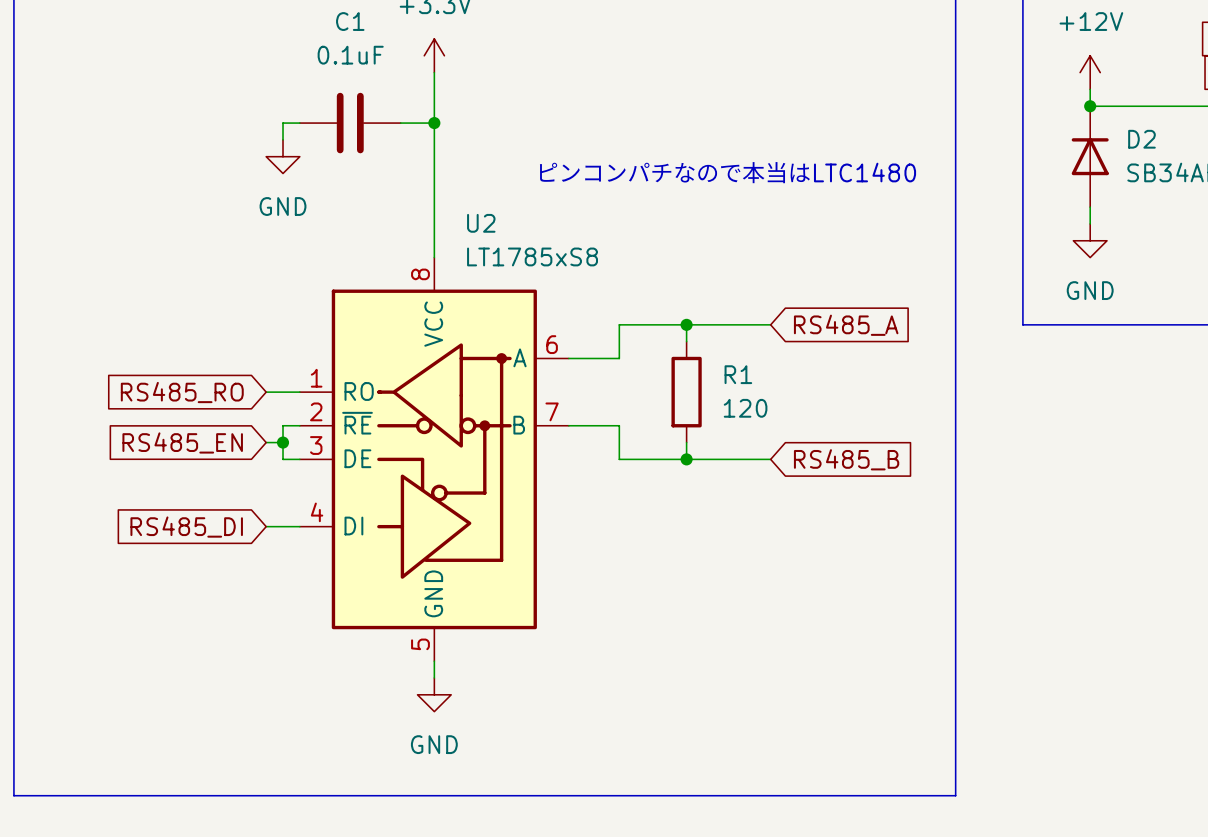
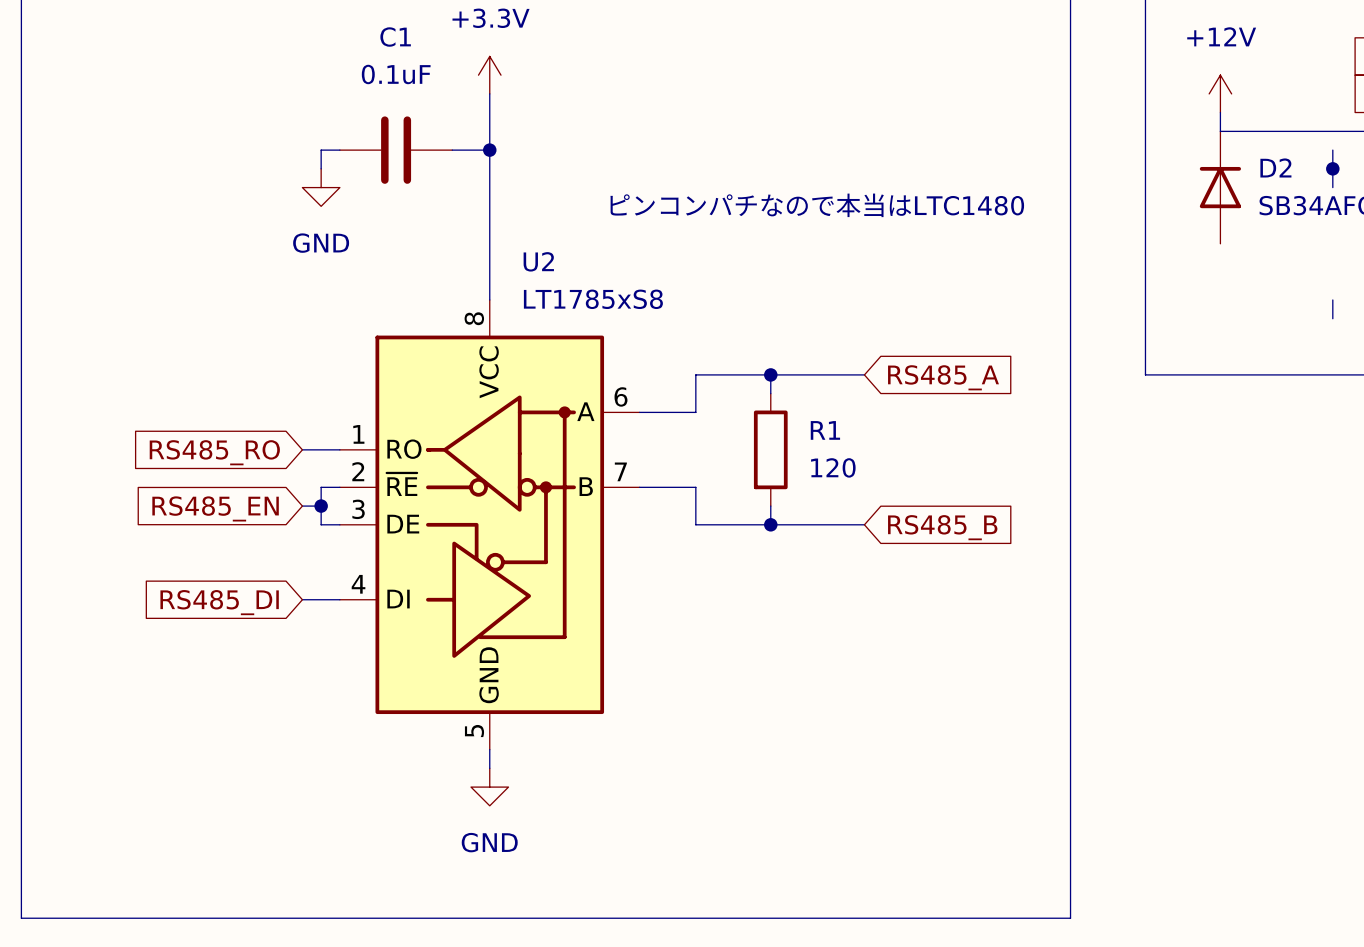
junction: (1090, 106) -> none
wire: none -> (1332, 150) (1332, 187)
junction: none -> (1332, 168)
wire: (1090, 207) (1090, 223) -> (1332, 299) (1332, 318)
power symbol: GND (1090, 240) -> none
line: (13, 795) (955, 795) -> (21, 899) (21, 918) (1070, 918) (1070, 899)

